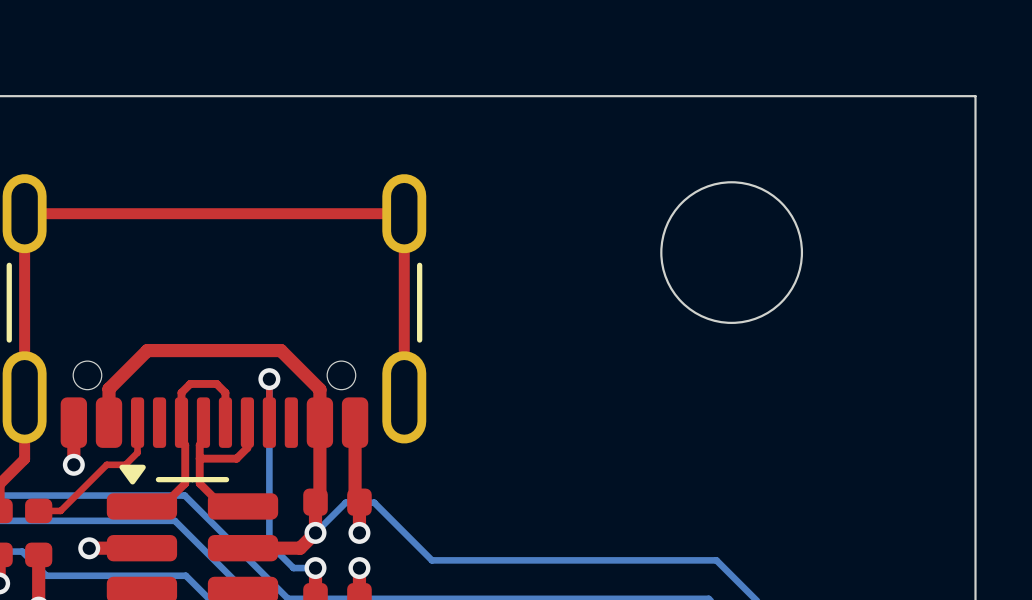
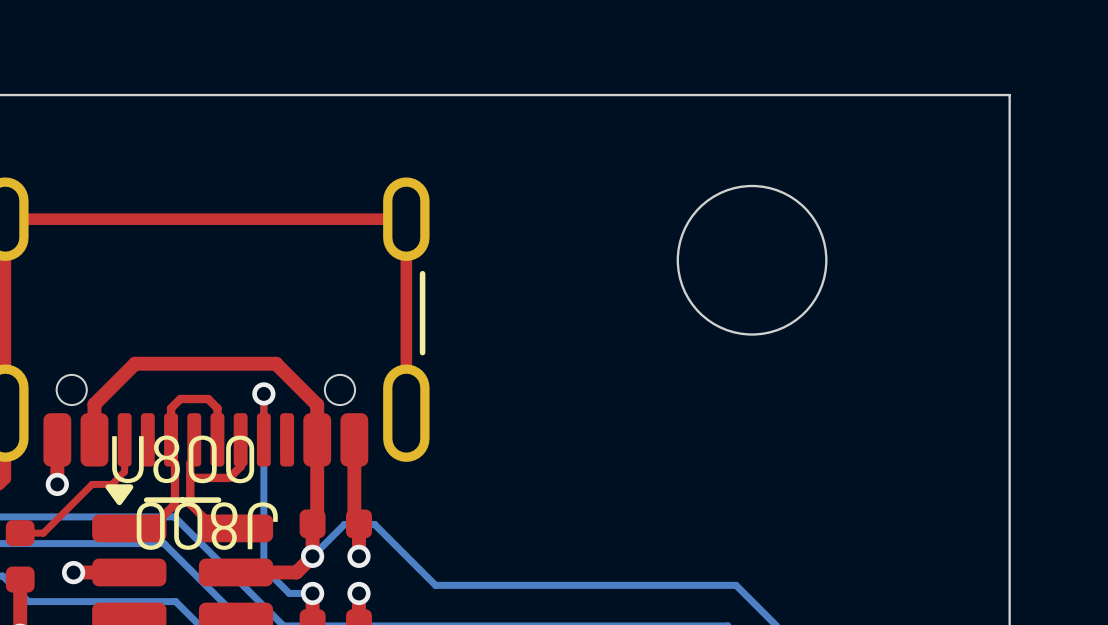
U800 name: none -> U800 (183, 459)
J800 name: none -> J800 (207, 526)

